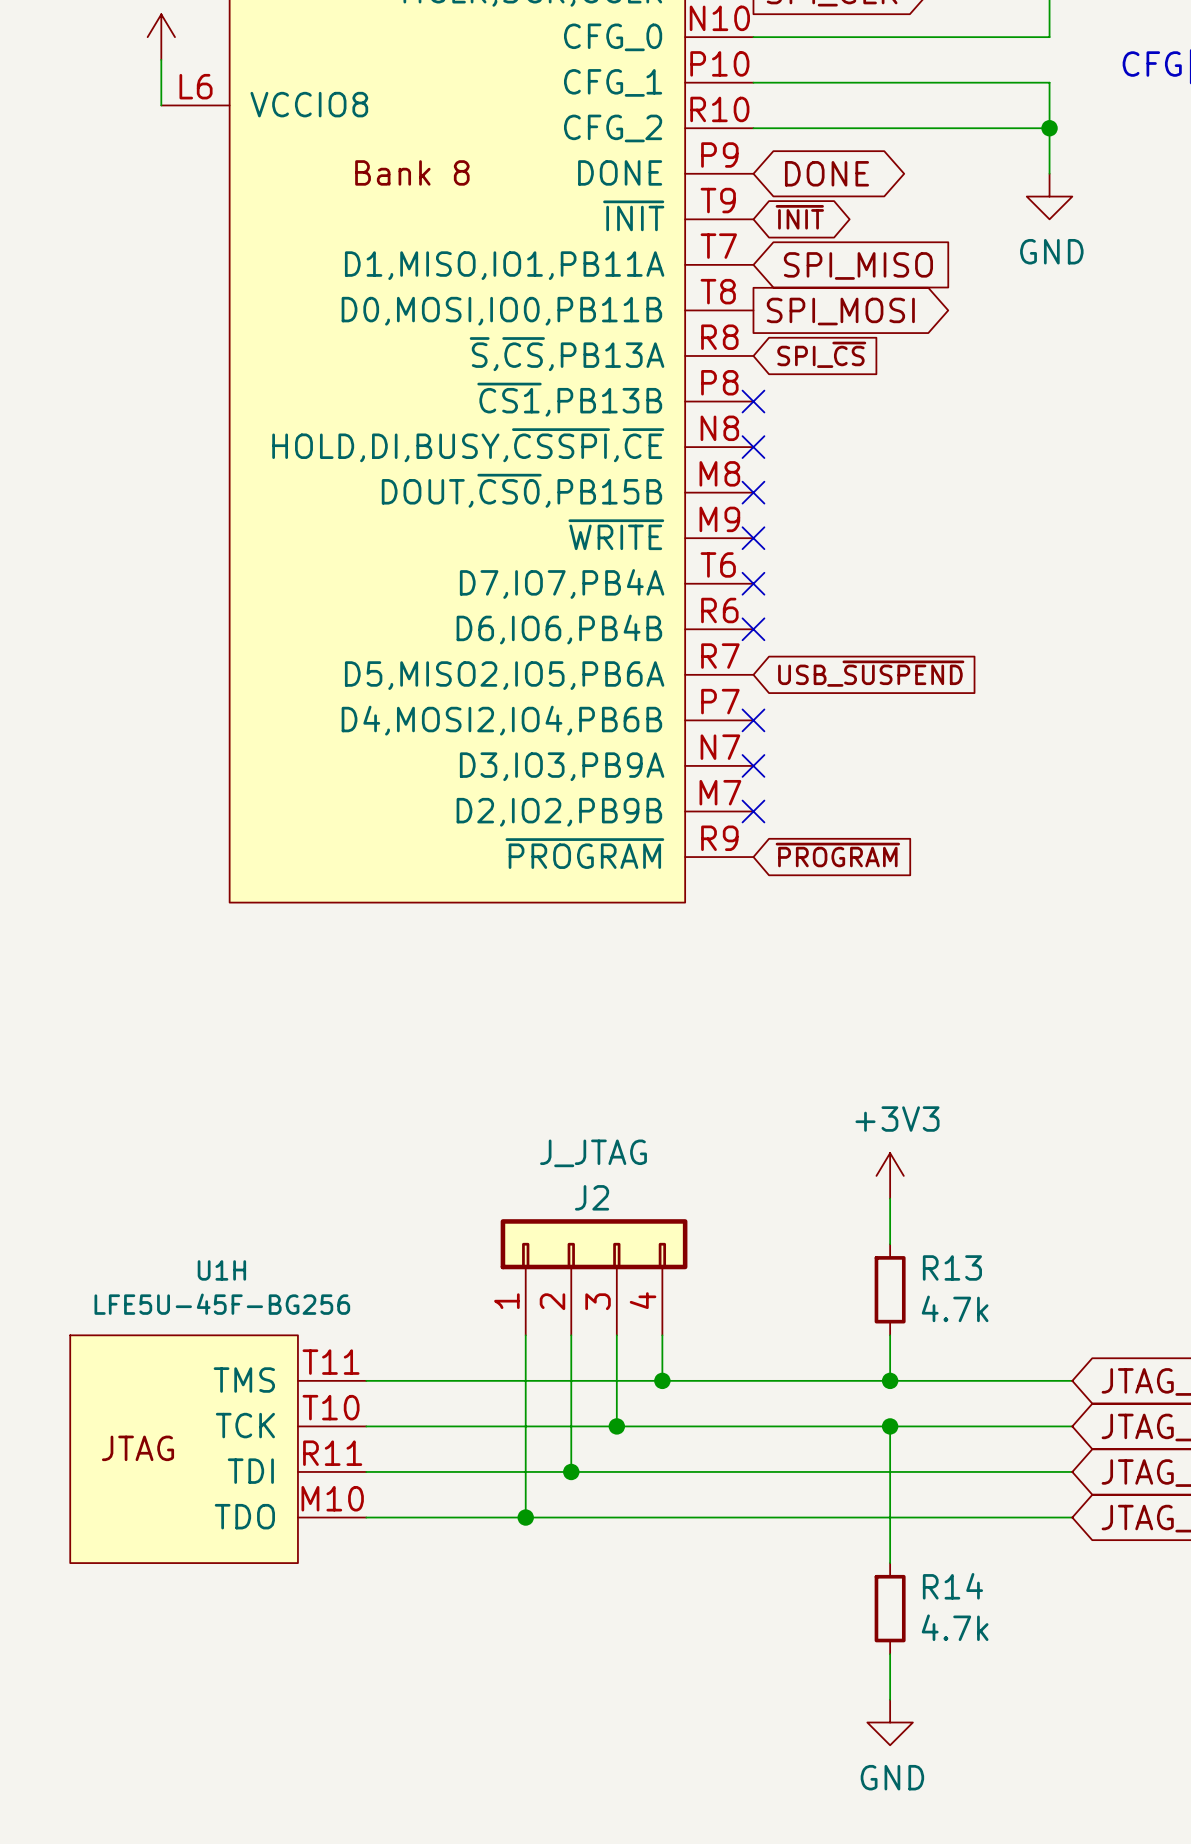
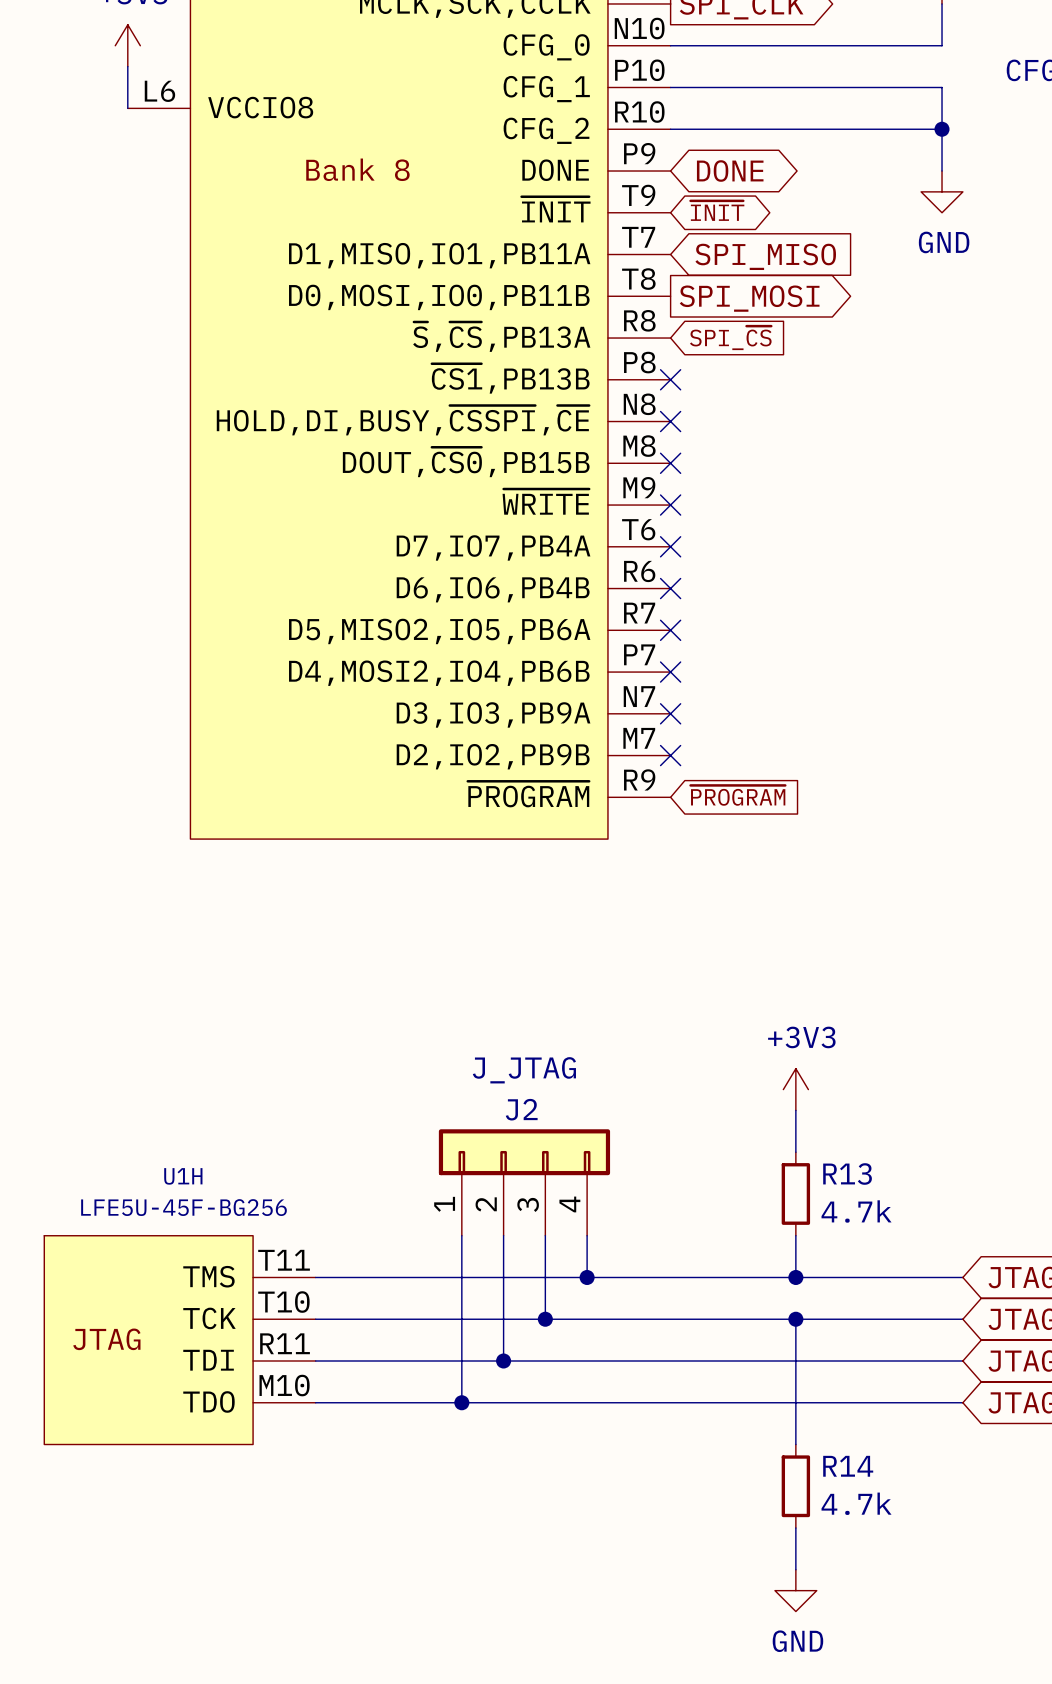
global label: USB_~{SUSPEND} (871, 673) -> none
no-connect mark: none -> (670, 630)

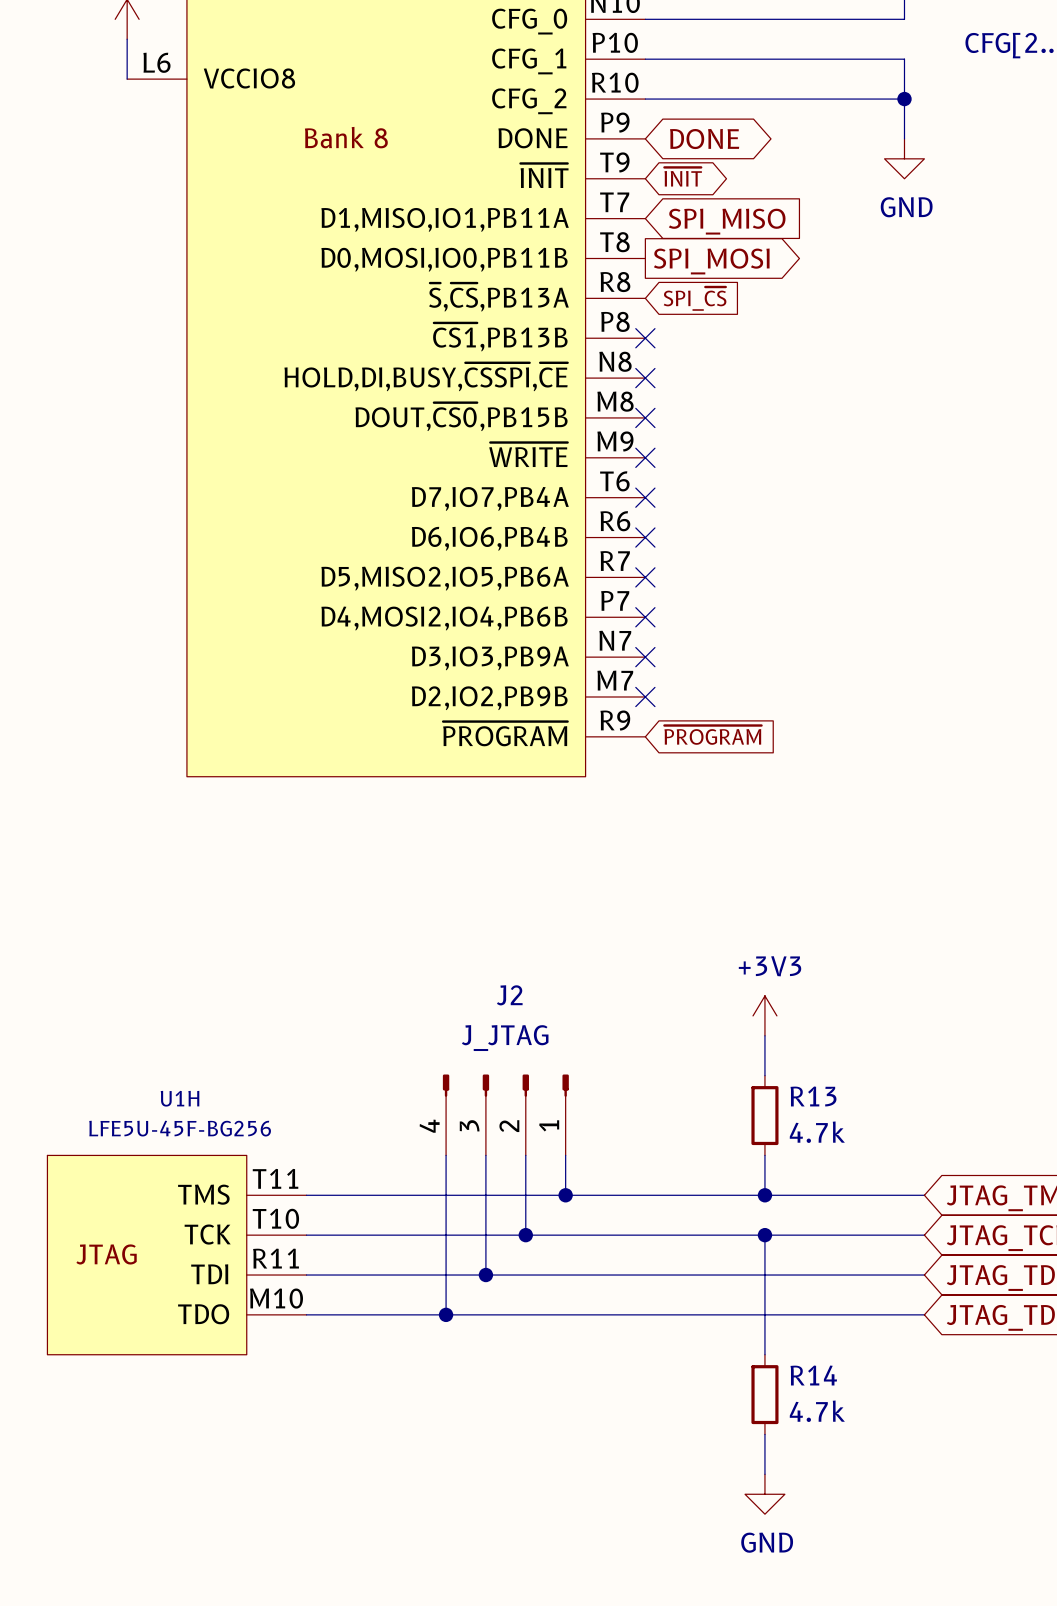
J2 name position: J2 (521, 1109) -> J2 (509, 995)
J2 symbol: [438, 1129, 611, 1236] -> [442, 1074, 569, 1156]

